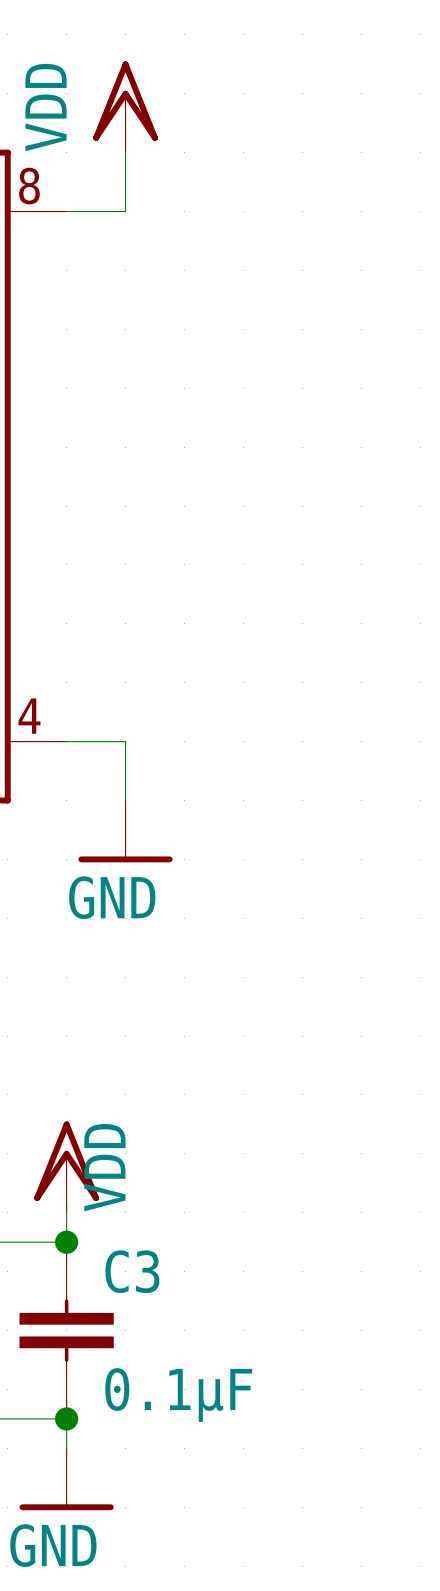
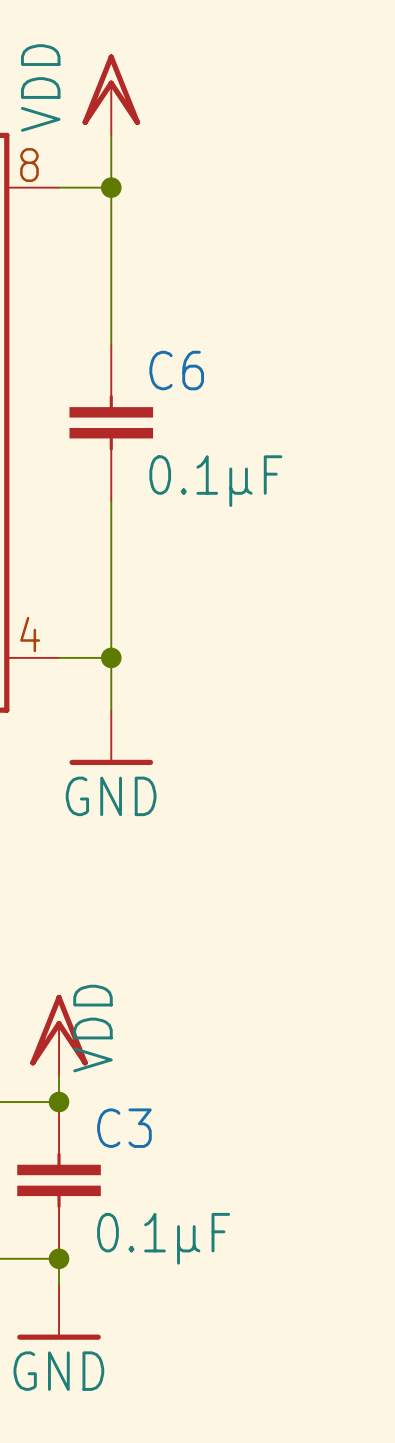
wire: none -> (111, 187) (111, 344)
junction: none -> (111, 187)
C6: none -> 0.1µF (111, 422)
wire: none -> (111, 501) (111, 657)
junction: none -> (111, 657)

